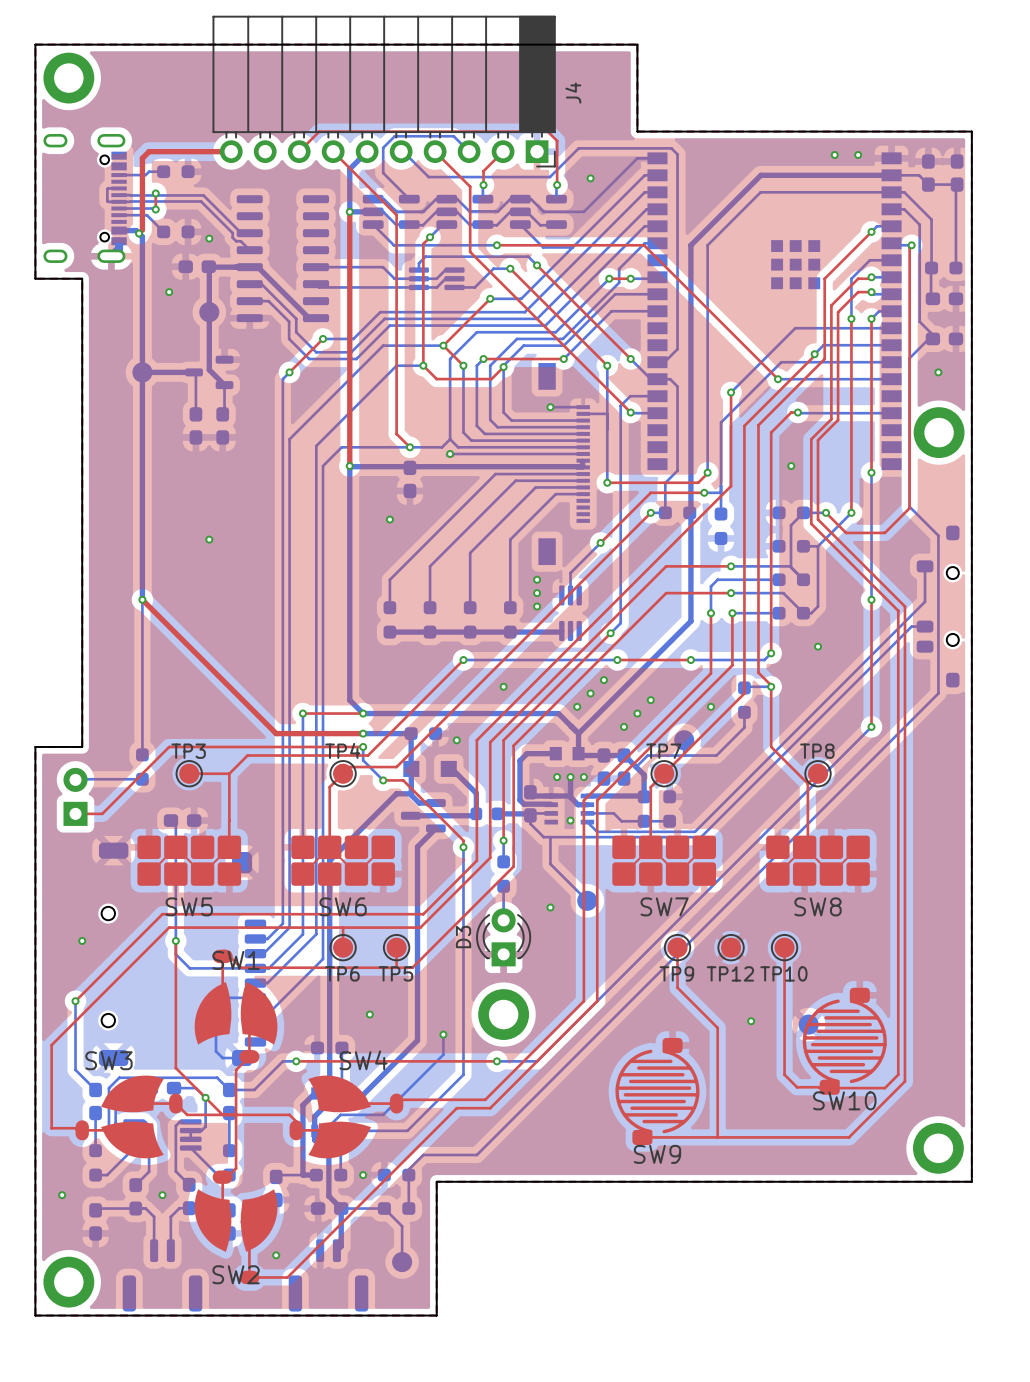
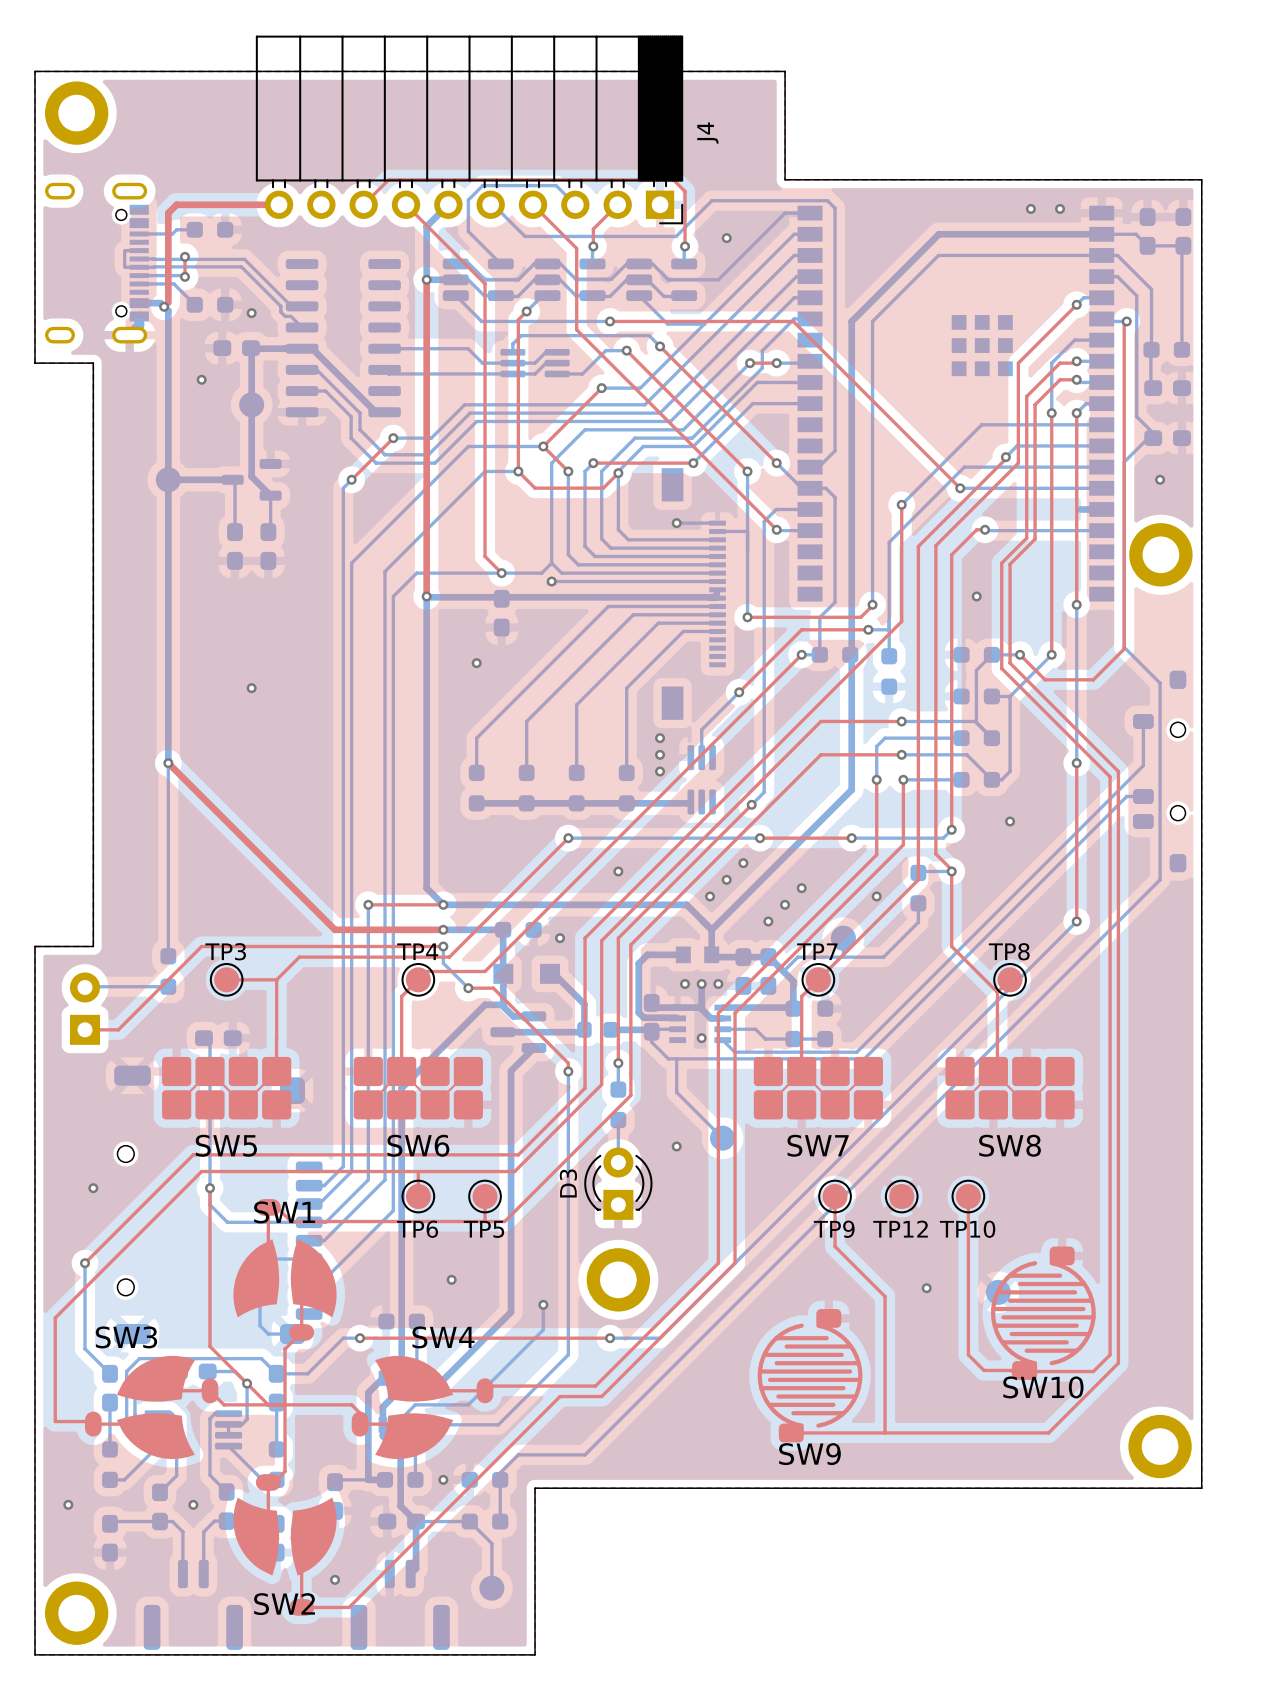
bottom track: none -> (1080, 509) (1101, 509)

